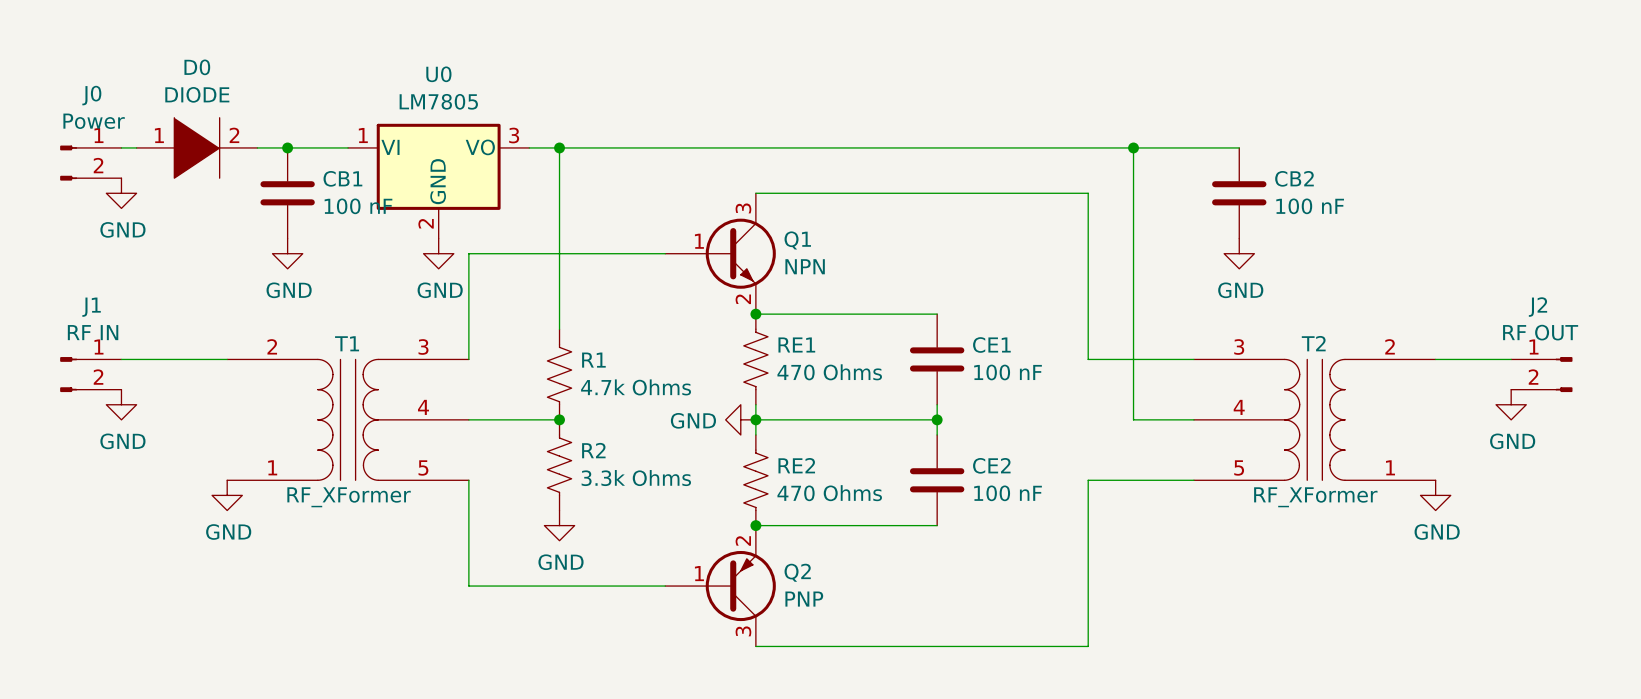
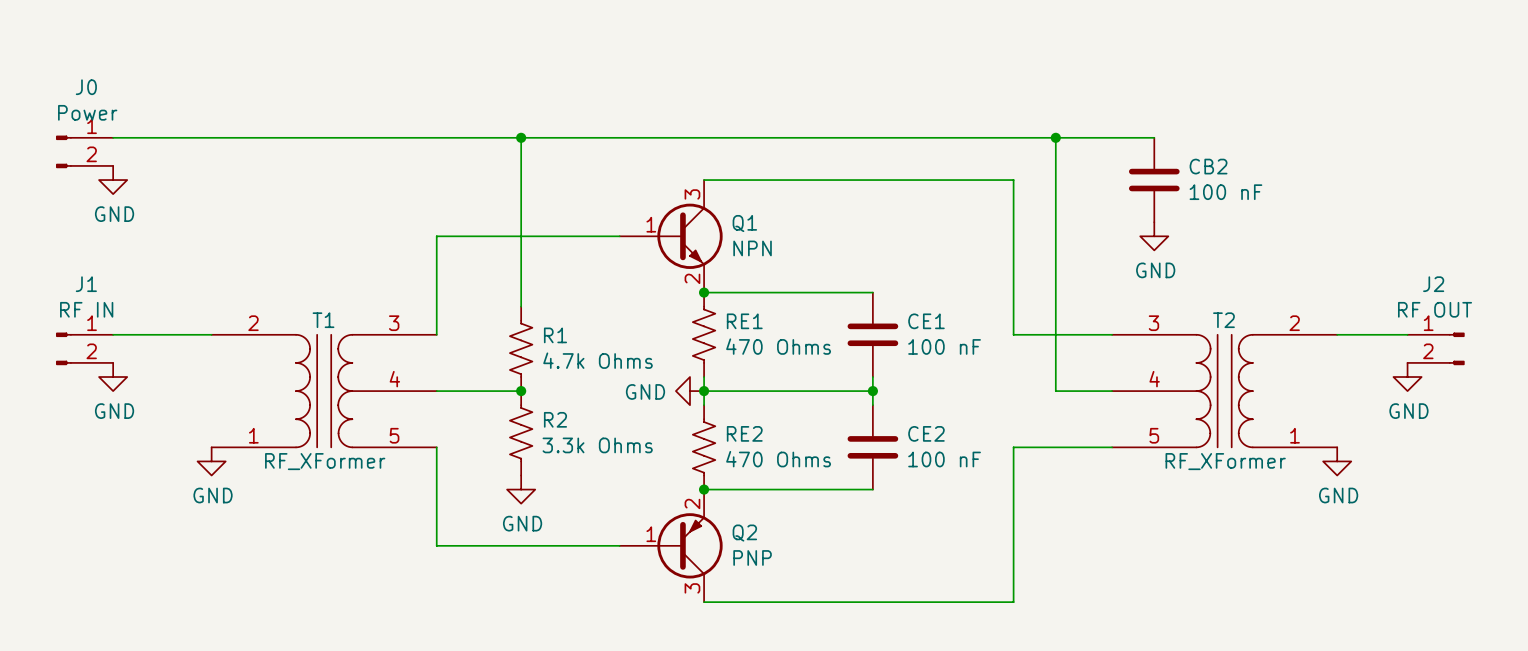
D0: DIODE (196, 147) -> none
junction: (287, 147) -> none
U0: LM7805 (438, 181) -> none
CB1: 100 nF (287, 193) -> none
power symbol: GND (287, 253) -> none
power symbol: GND (438, 253) -> none

